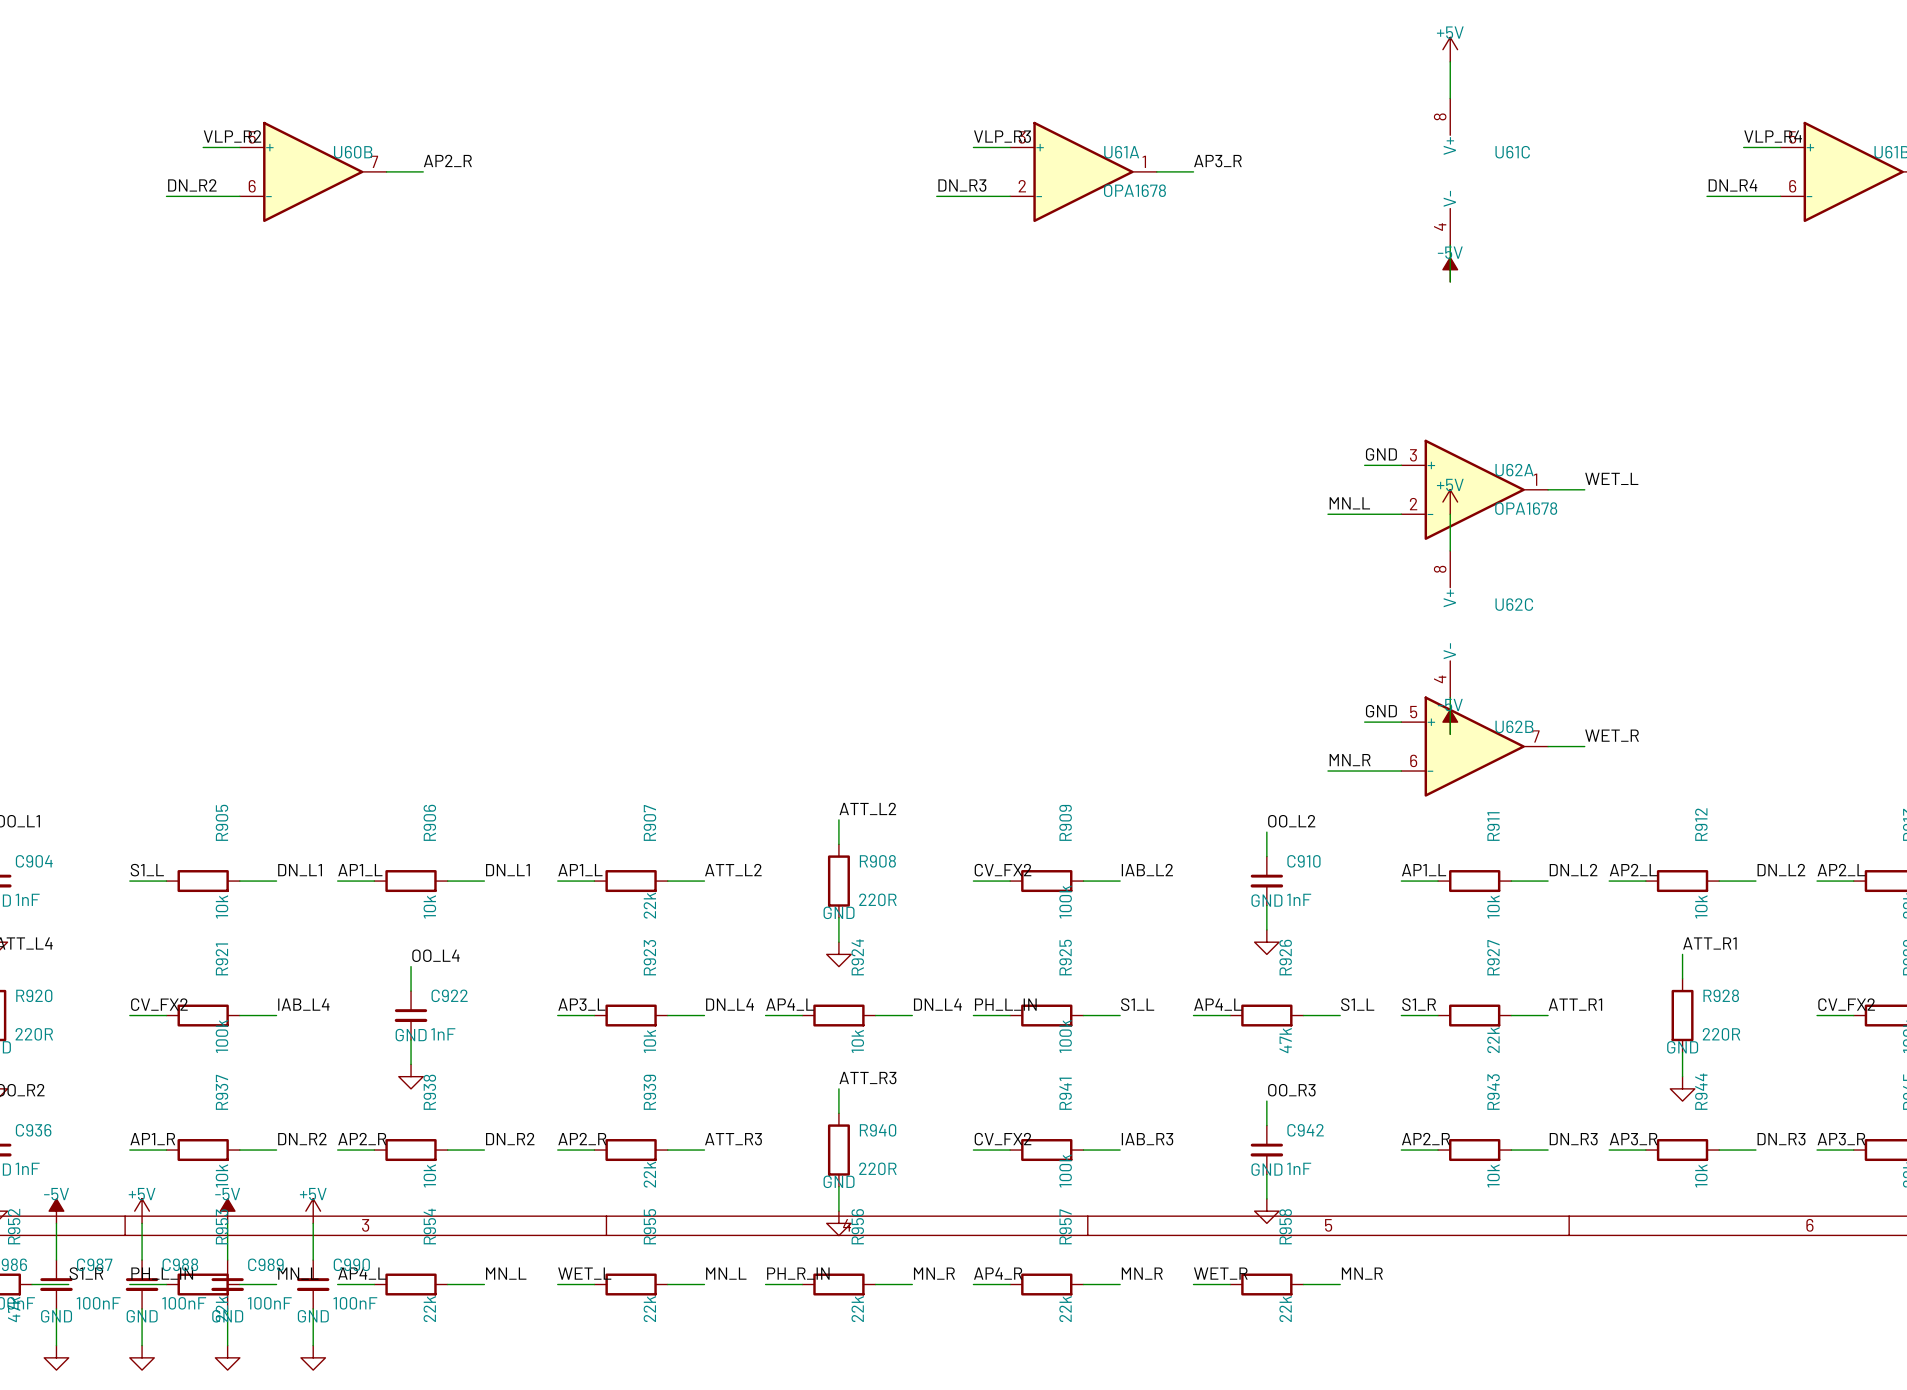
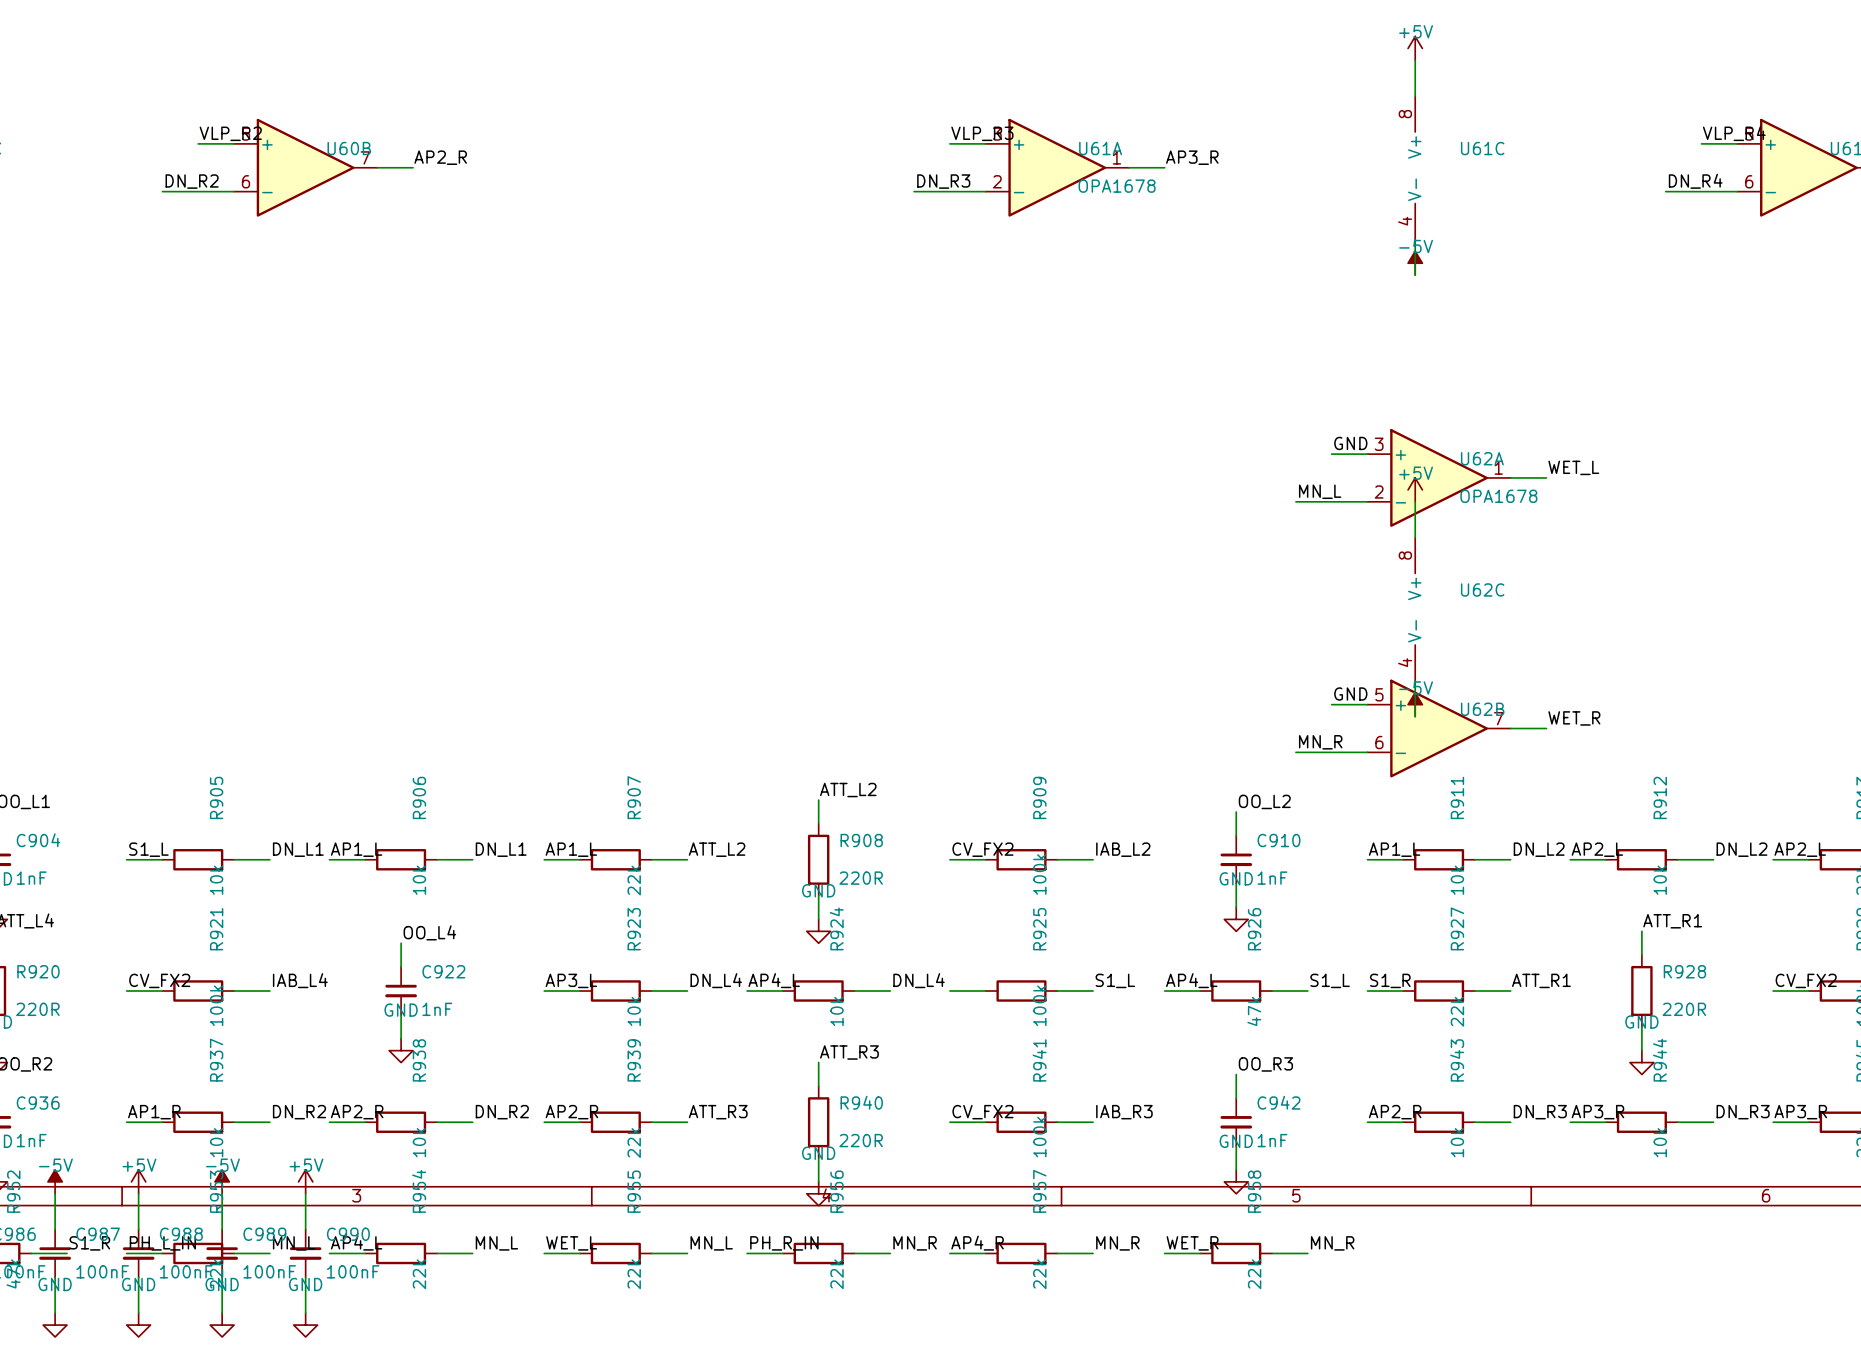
label: PH_L_IN (1005, 1004) -> none

